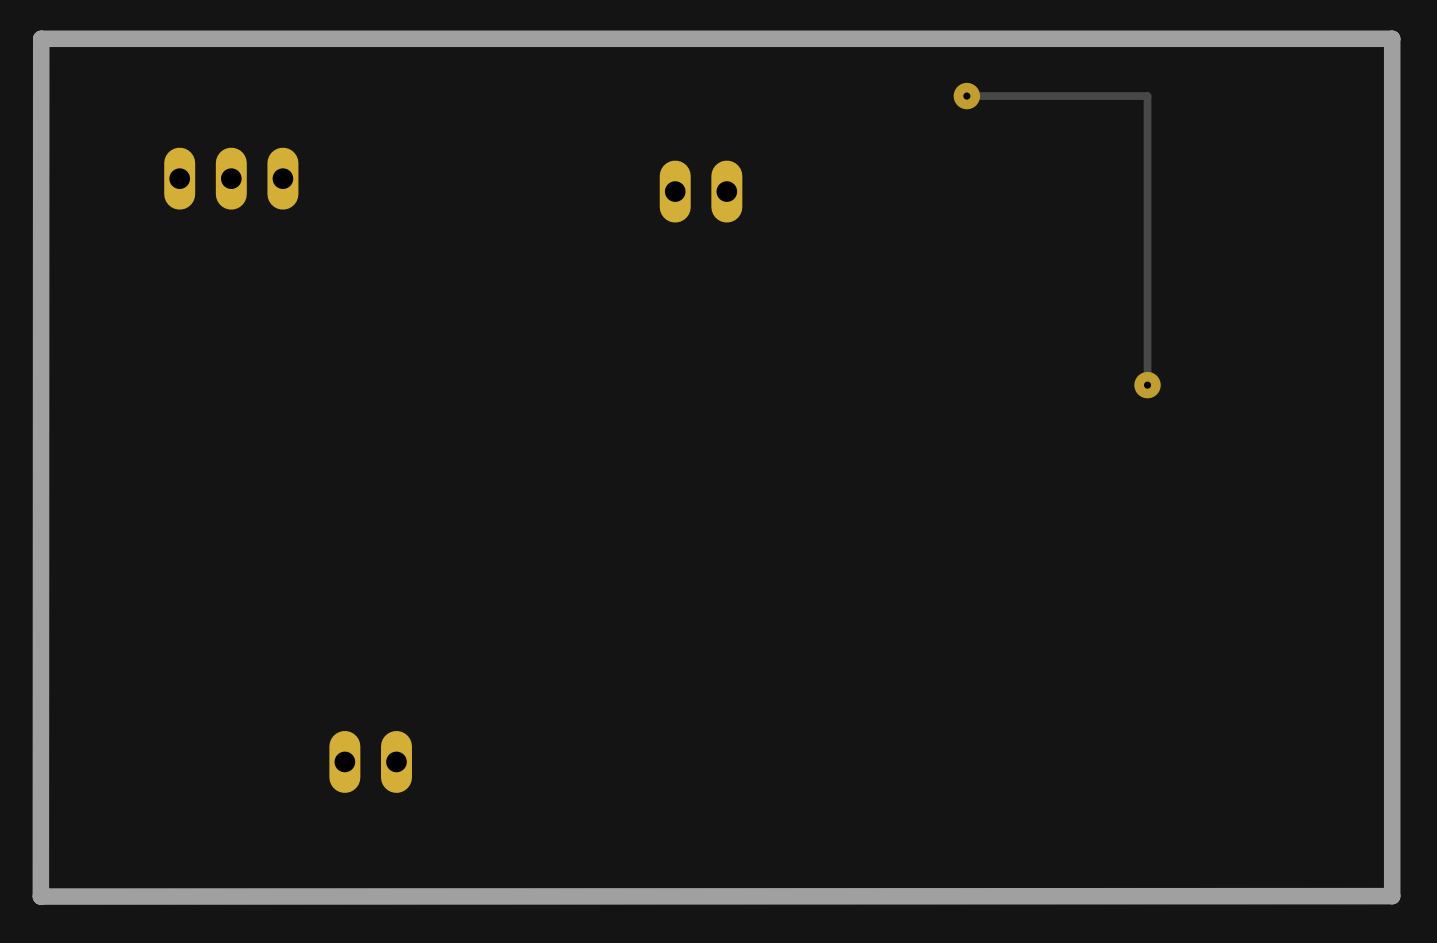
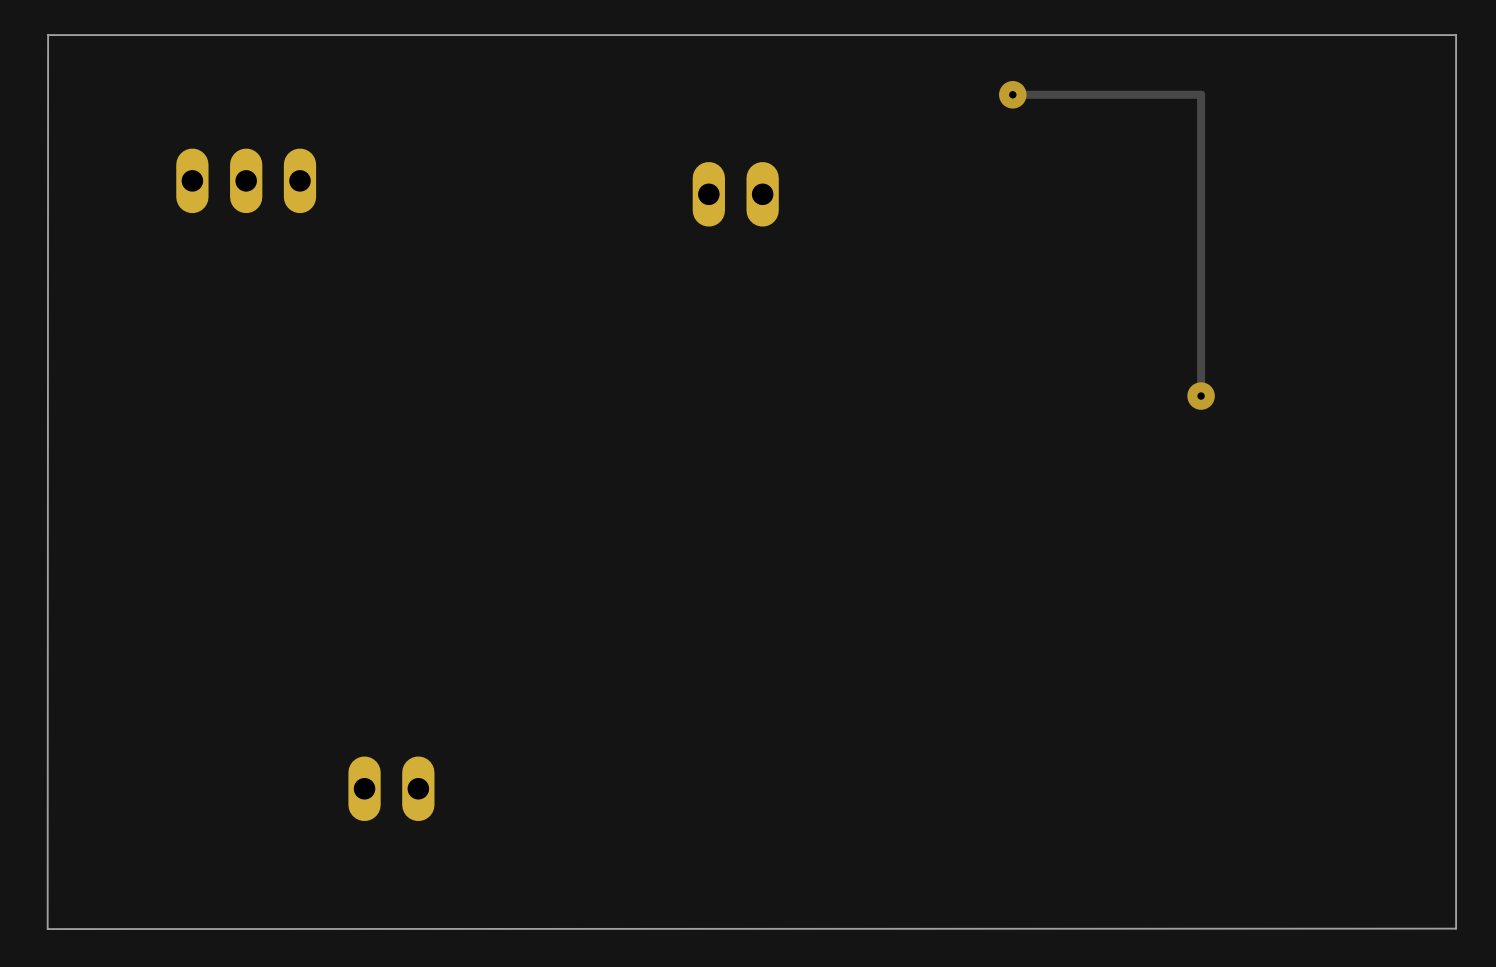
board edge width: thick (1392, 38) (41, 38) (40, 896) (1392, 896) (1392, 38) -> thin (1456, 35) (48, 35) (47, 929) (1456, 928) (1456, 35)

